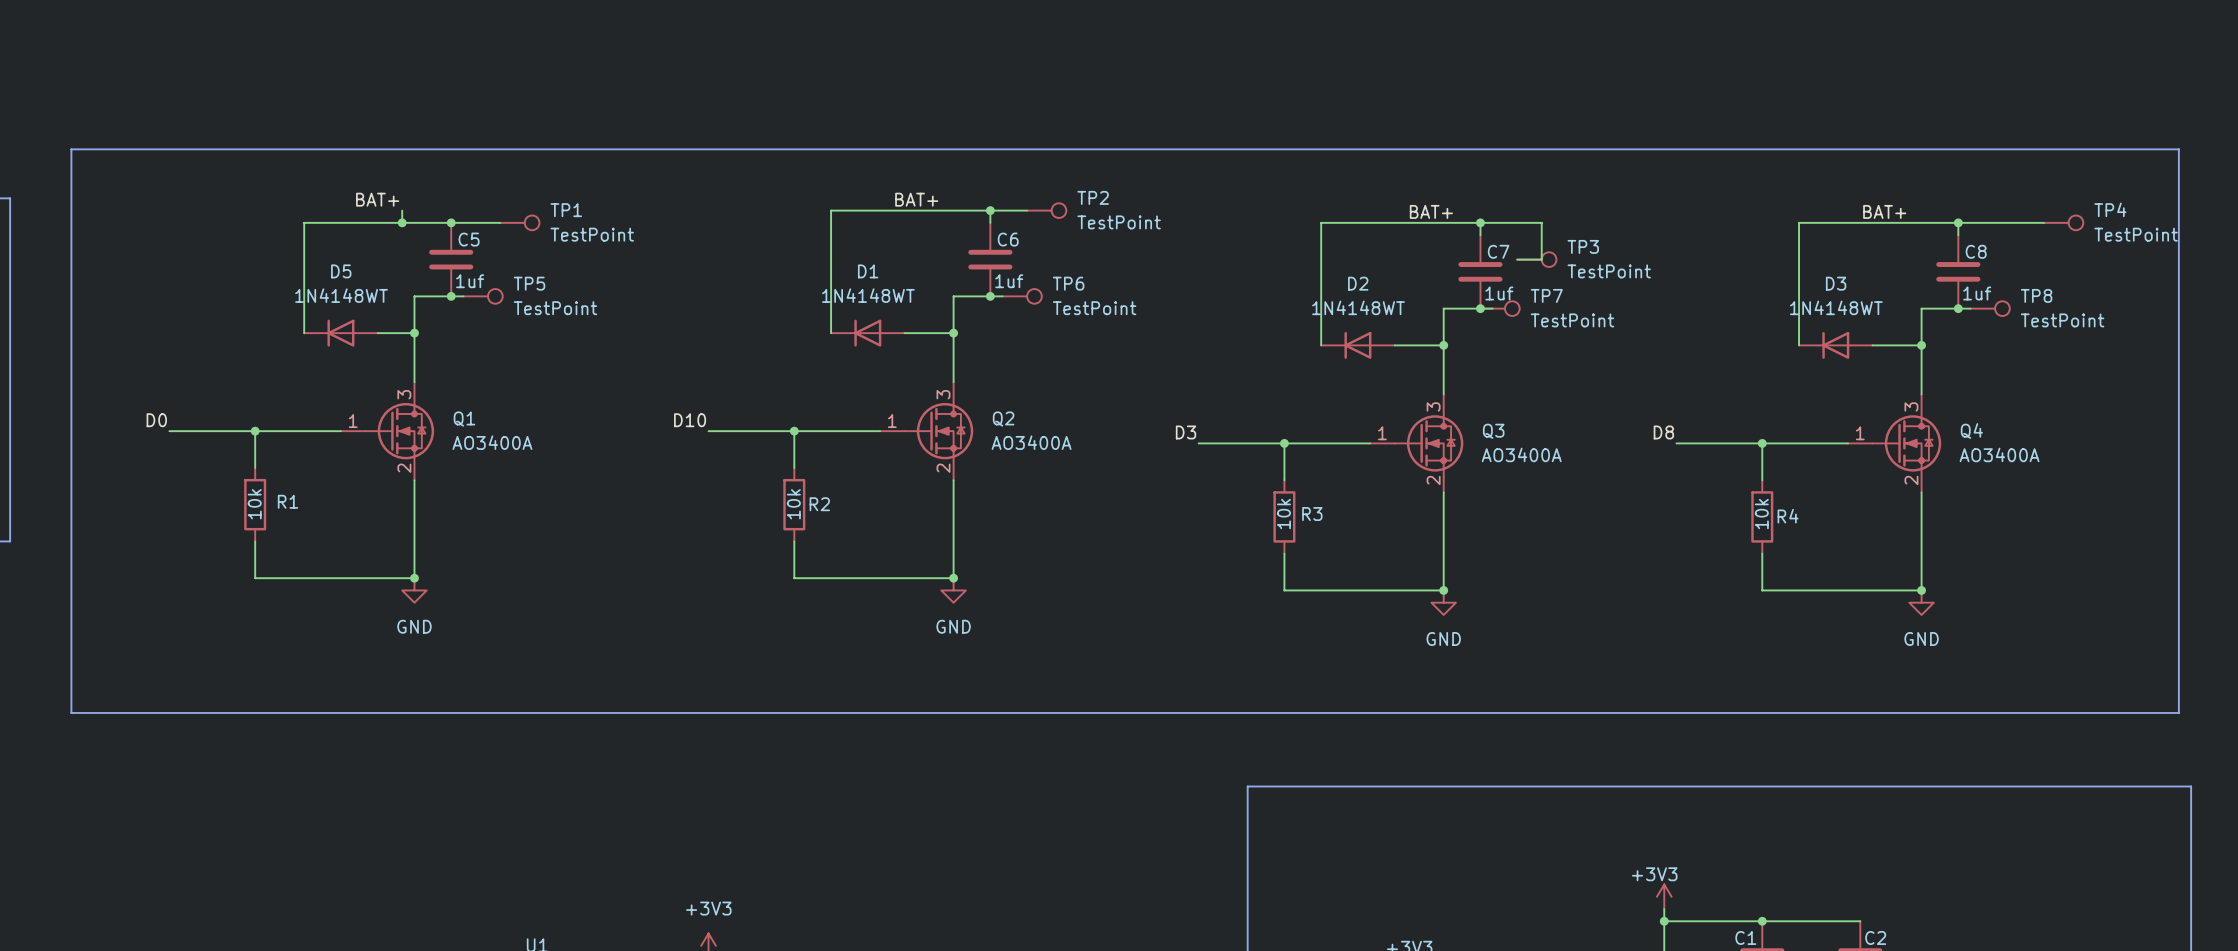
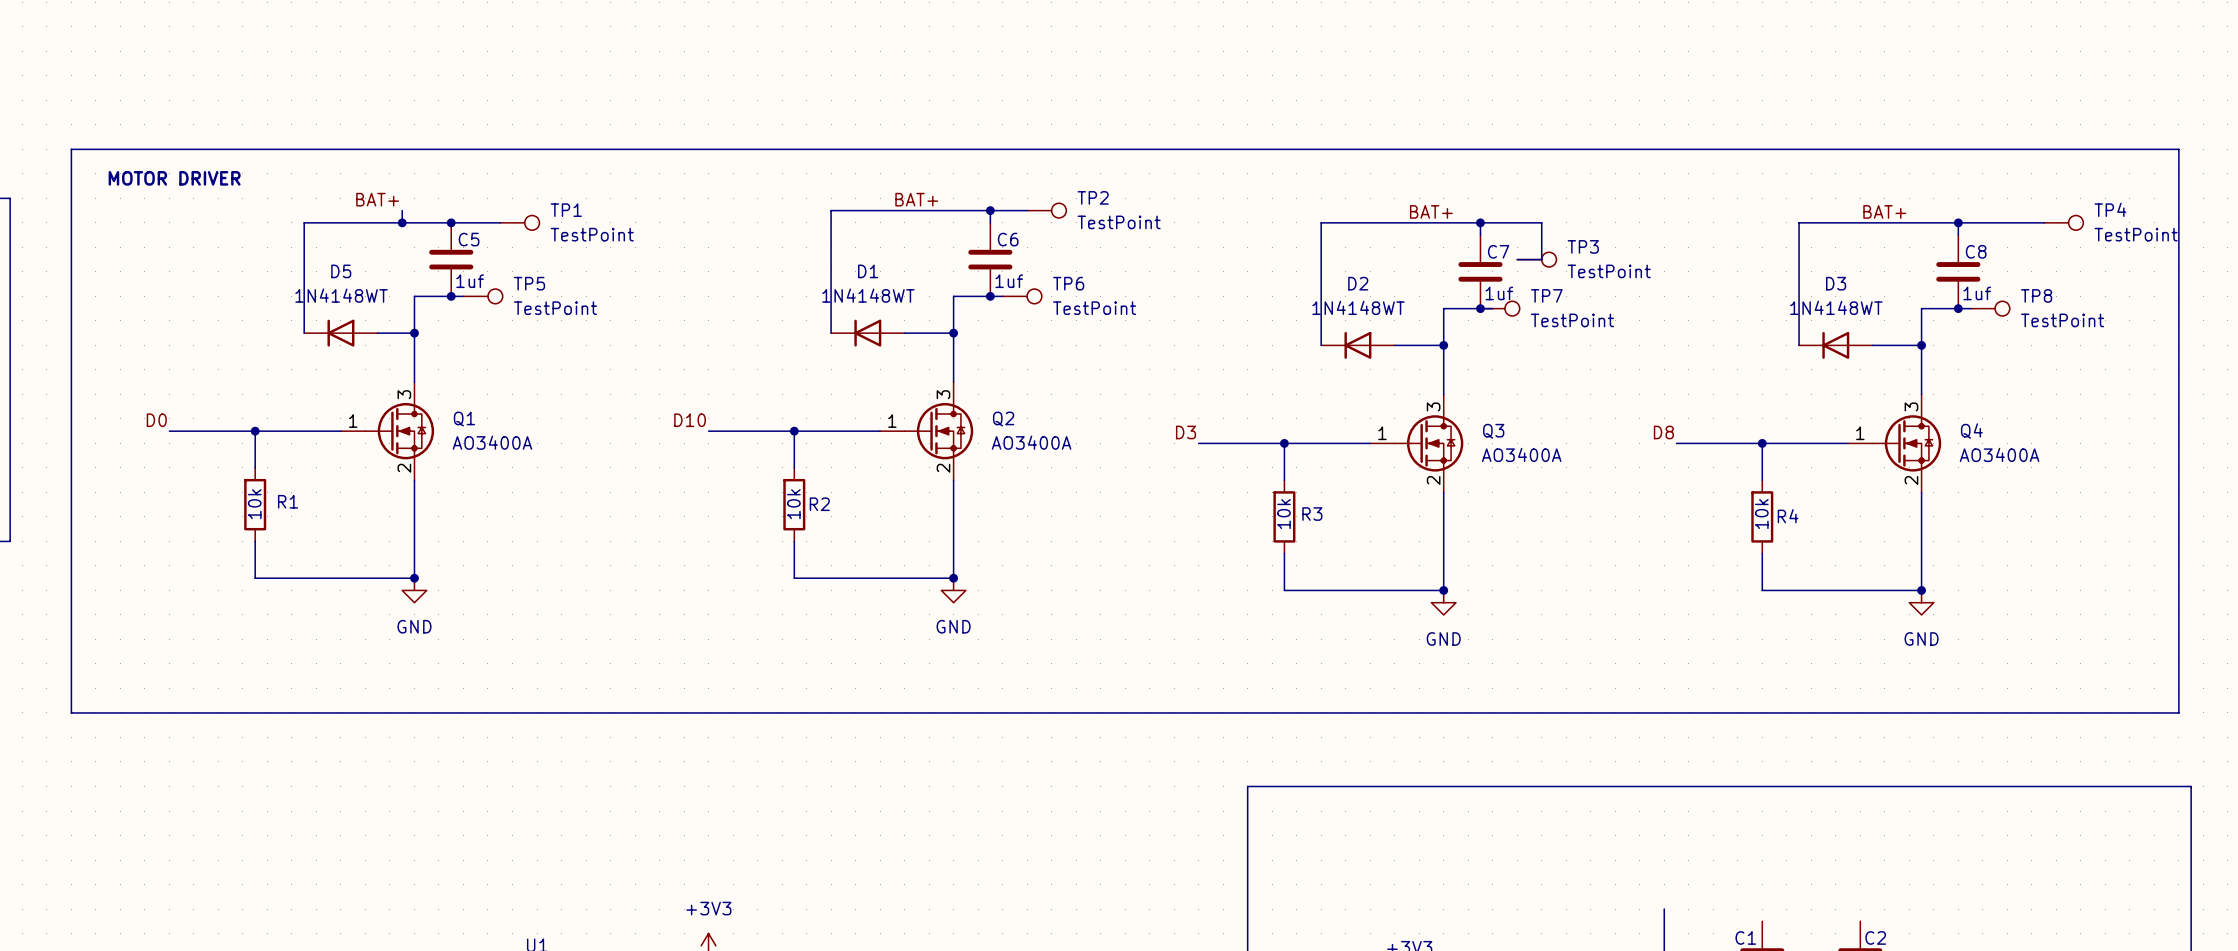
text: none -> MOTOR DRIVER (174, 178)
power symbol: +3V3 (1664, 896) -> none
wire: (1664, 921) (1860, 921) -> none
junction: (1664, 921) -> none
junction: (1762, 921) -> none

